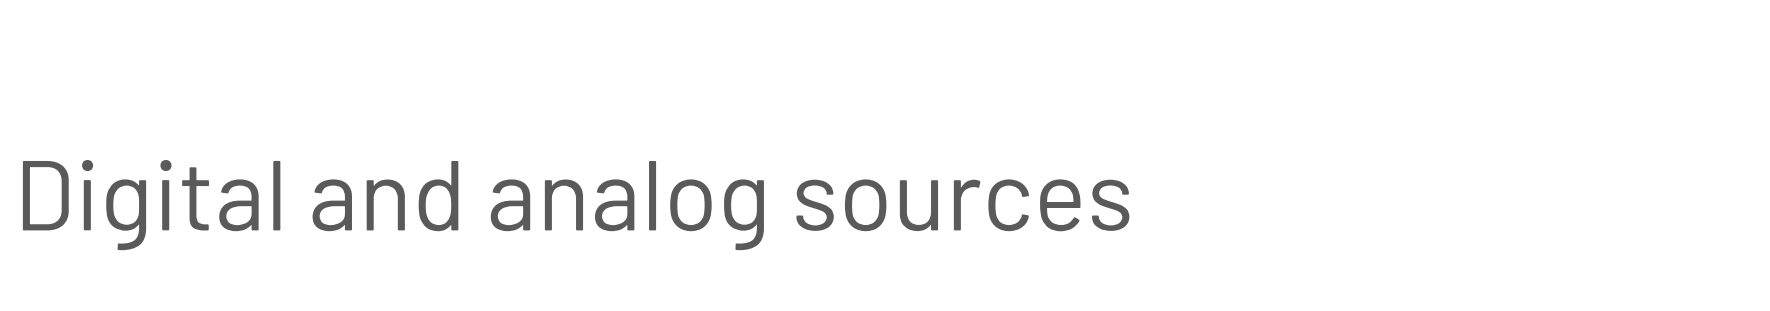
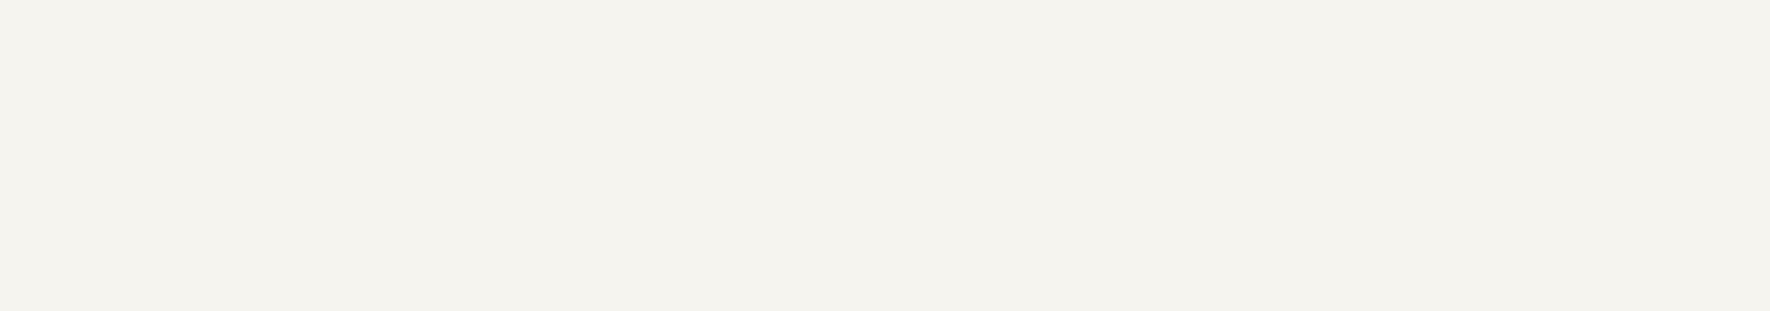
text: Digital and analog sources (576, 205) -> none

